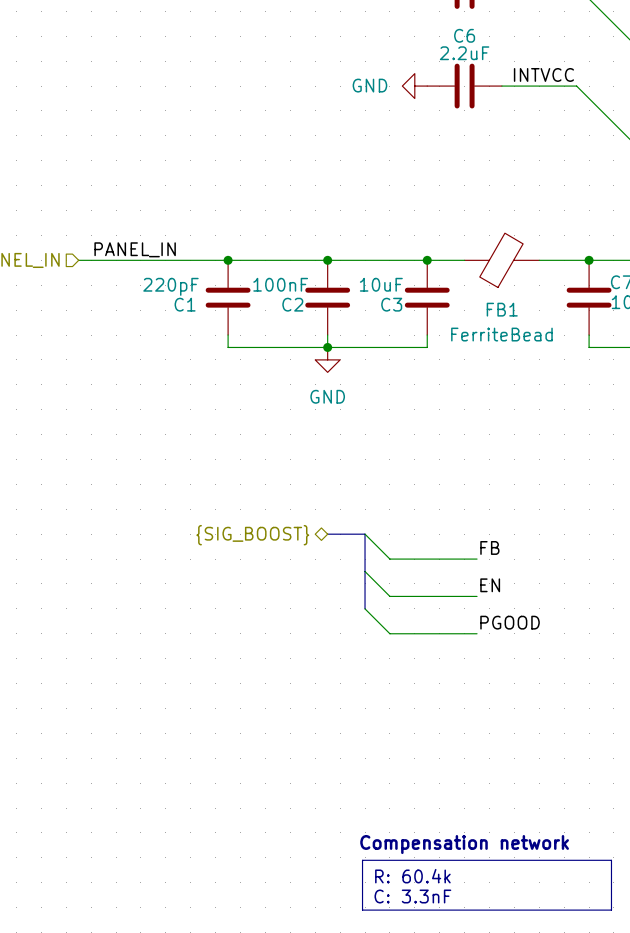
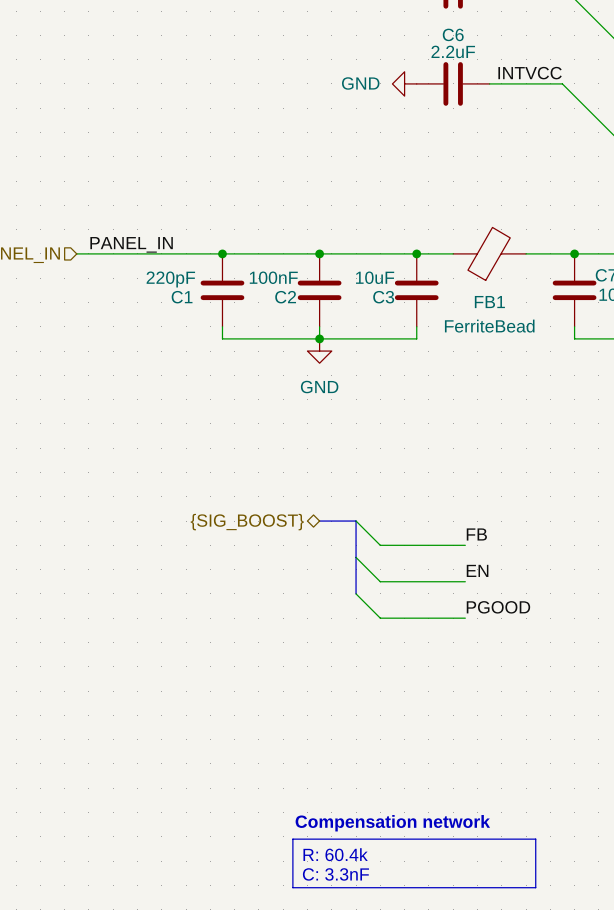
text position: Compensation network (464, 844) -> Compensation network (392, 823)
line: (362, 860) (362, 910) -> (353, 839) (292, 839) (292, 887) (353, 887)
line: (549, 860) (611, 860) (611, 910) (549, 910) -> (535, 839) (535, 887)
text position: R: 60.4k (412, 876) -> R: 60.4k (335, 854)
text position: C: 3.3nF (412, 896) -> C: 3.3nF (335, 874)

